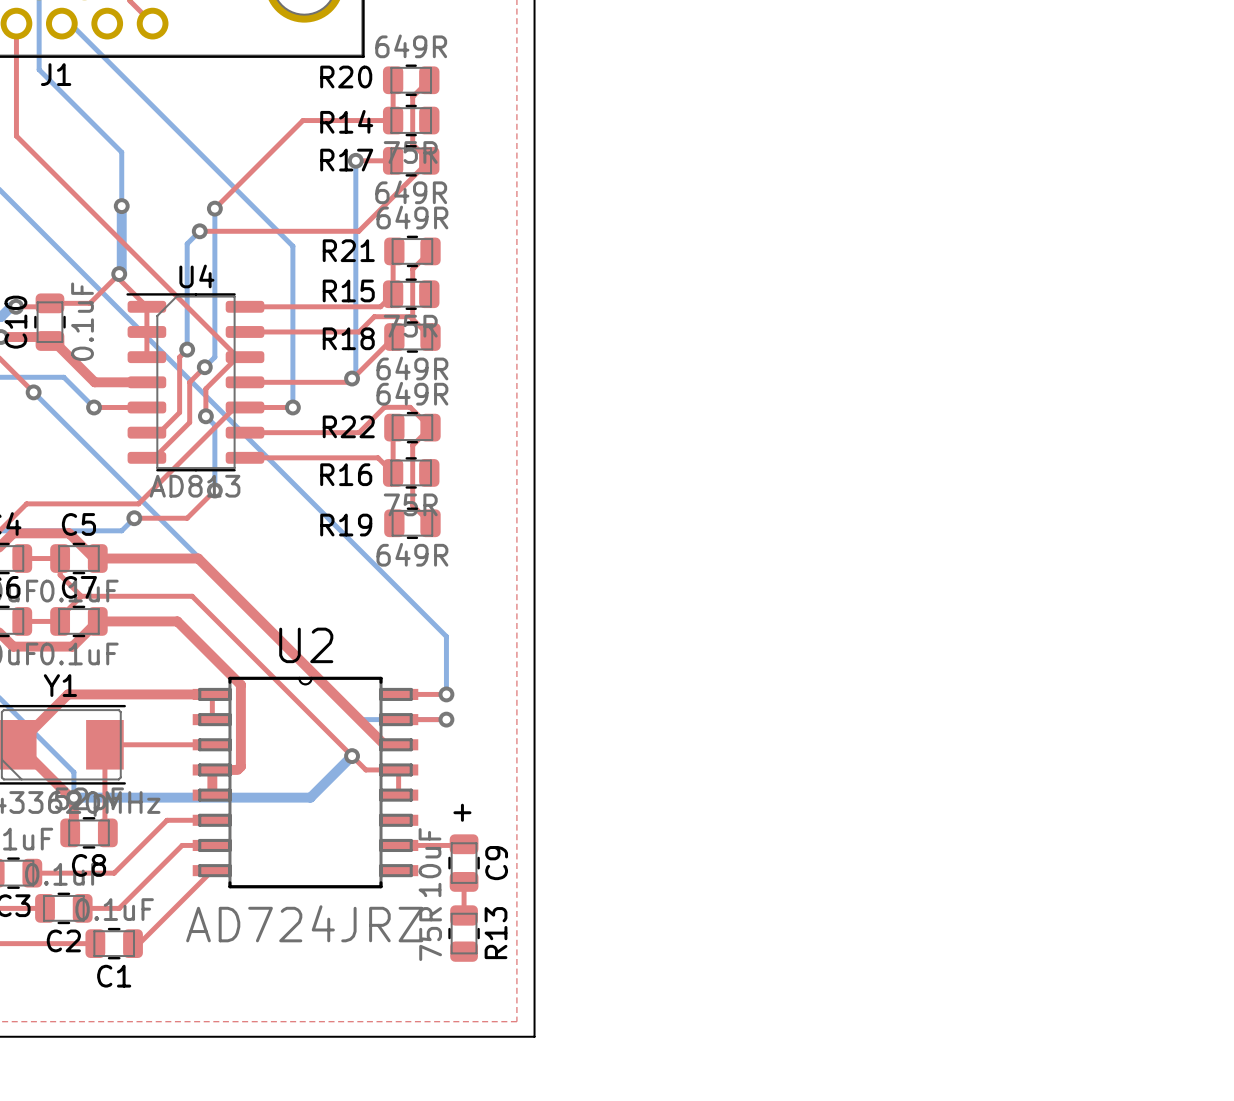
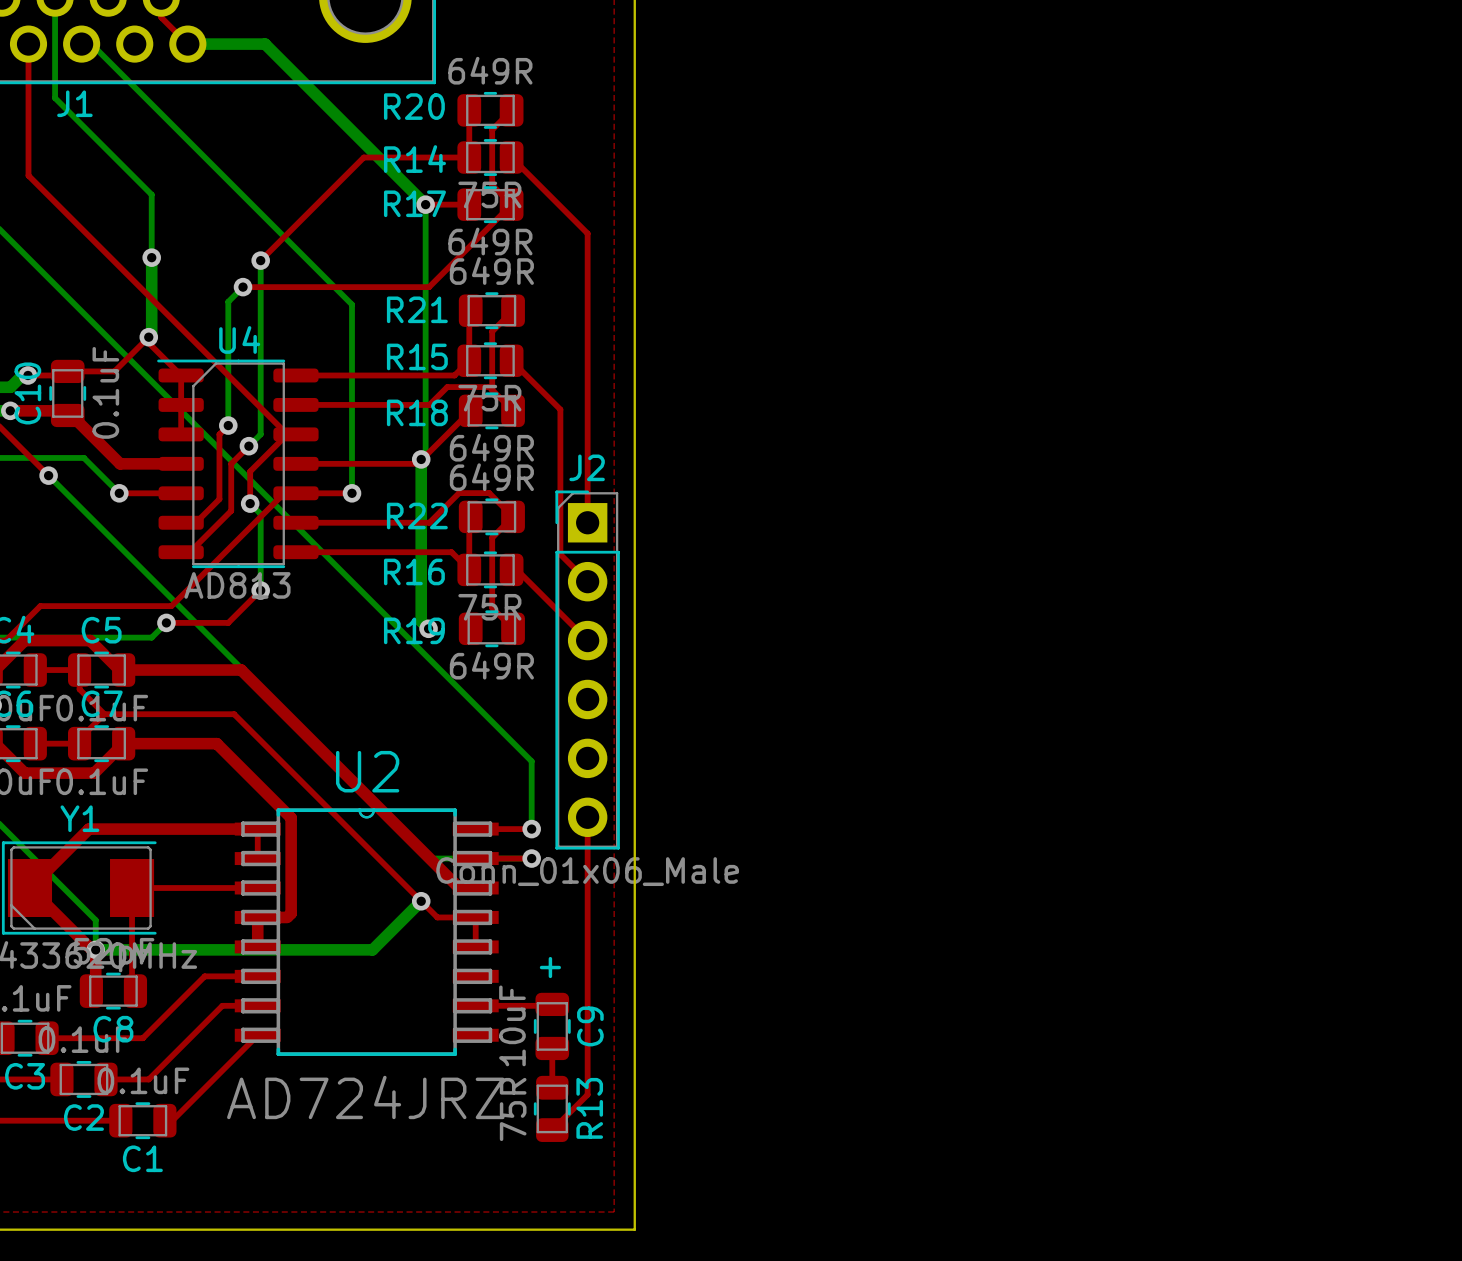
bottom track: none -> (187, 44) (265, 44) (425, 204)
top track: none -> (511, 157) (587, 233) (587, 522)
top track: none -> (511, 360) (560, 409) (560, 554) (587, 581)
bottom track: none -> (421, 459) (421, 621) (428, 628)
top track: none -> (511, 569) (516, 569) (587, 640)
via: none -> (428, 628)
J2: none -> Conn_01x06_Male (587, 670)
top track: none -> (587, 817) (587, 1094) (552, 1130)

